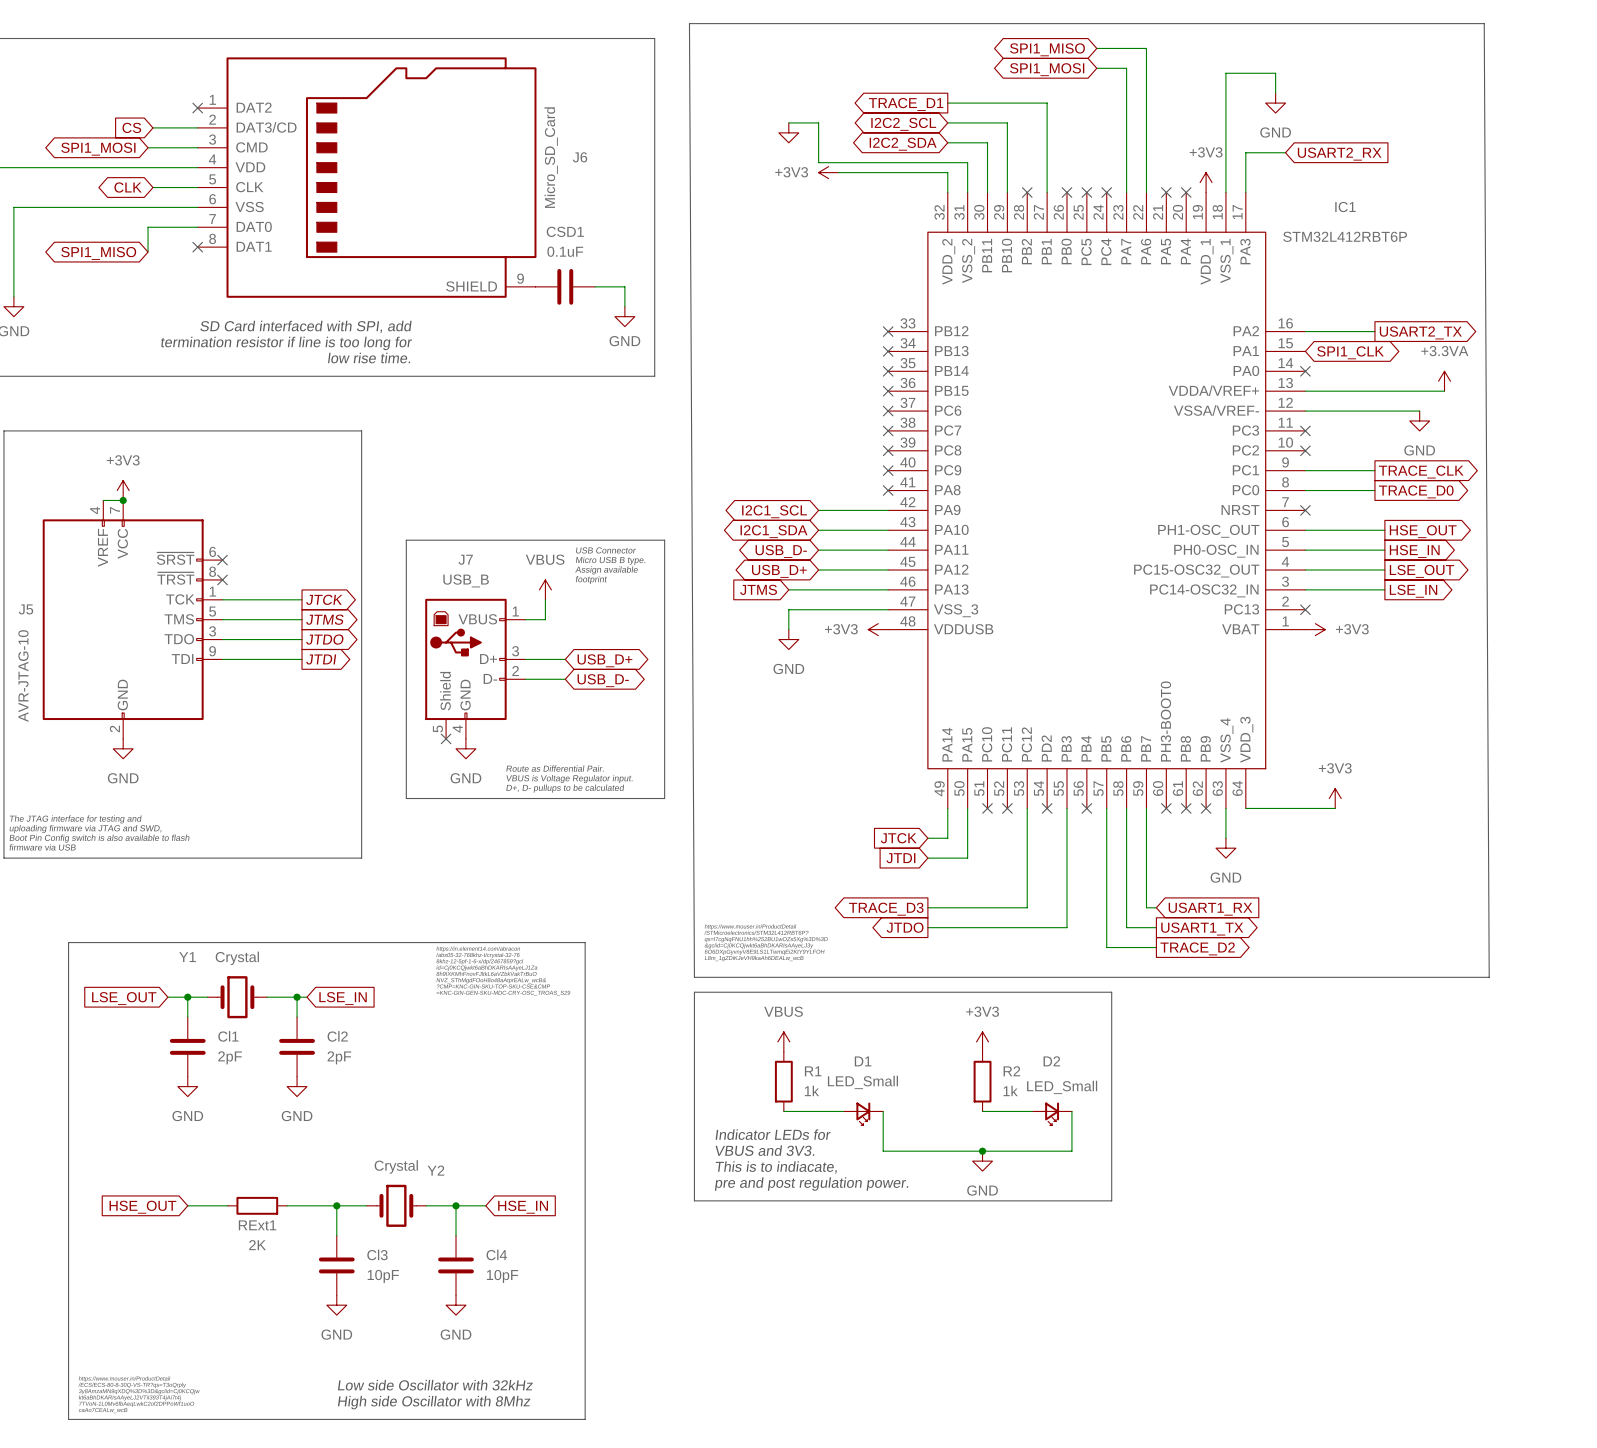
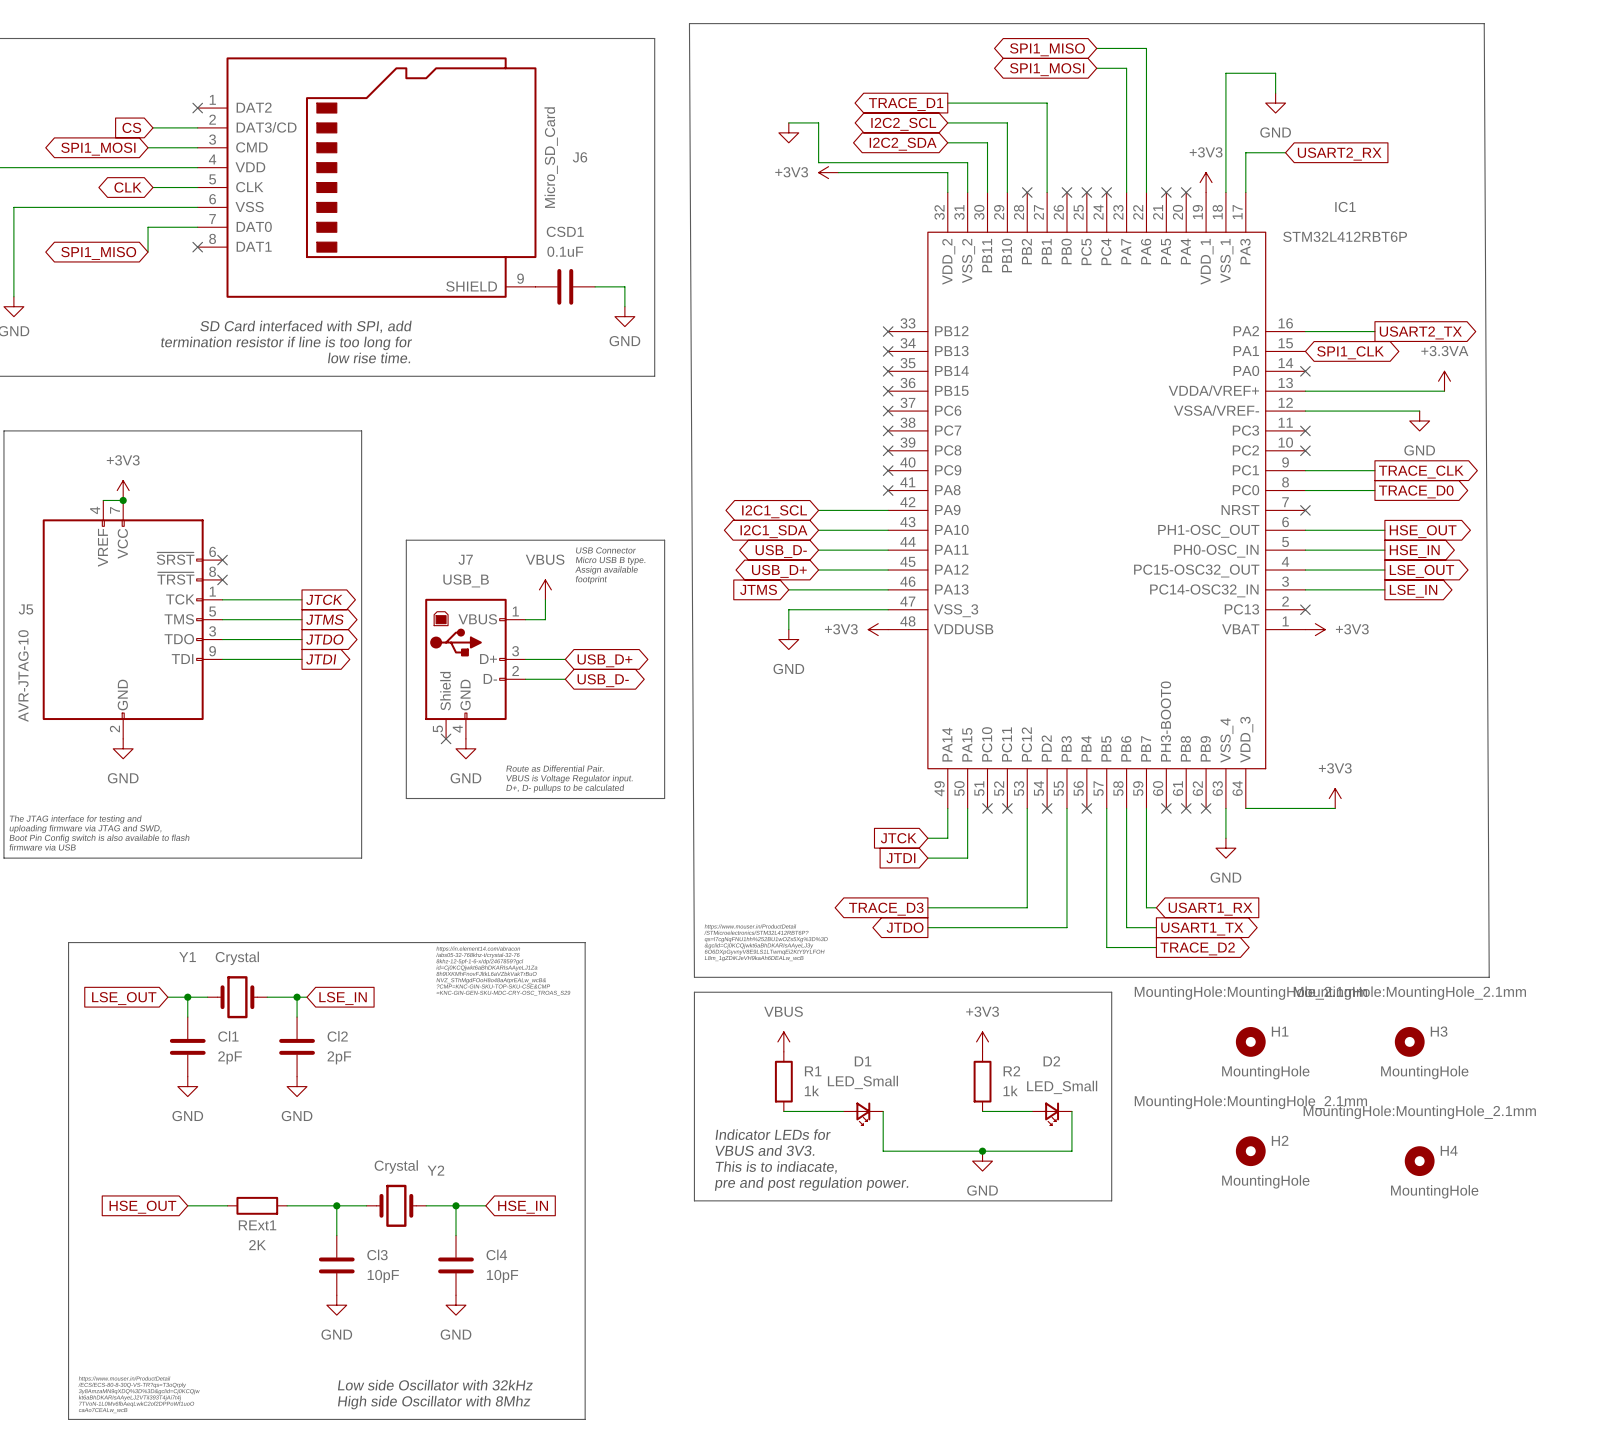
H1: none -> MountingHole (1250, 1041)
H3: none -> MountingHole (1409, 1041)
H2: none -> MountingHole (1250, 1151)
H4: none -> MountingHole (1419, 1161)

